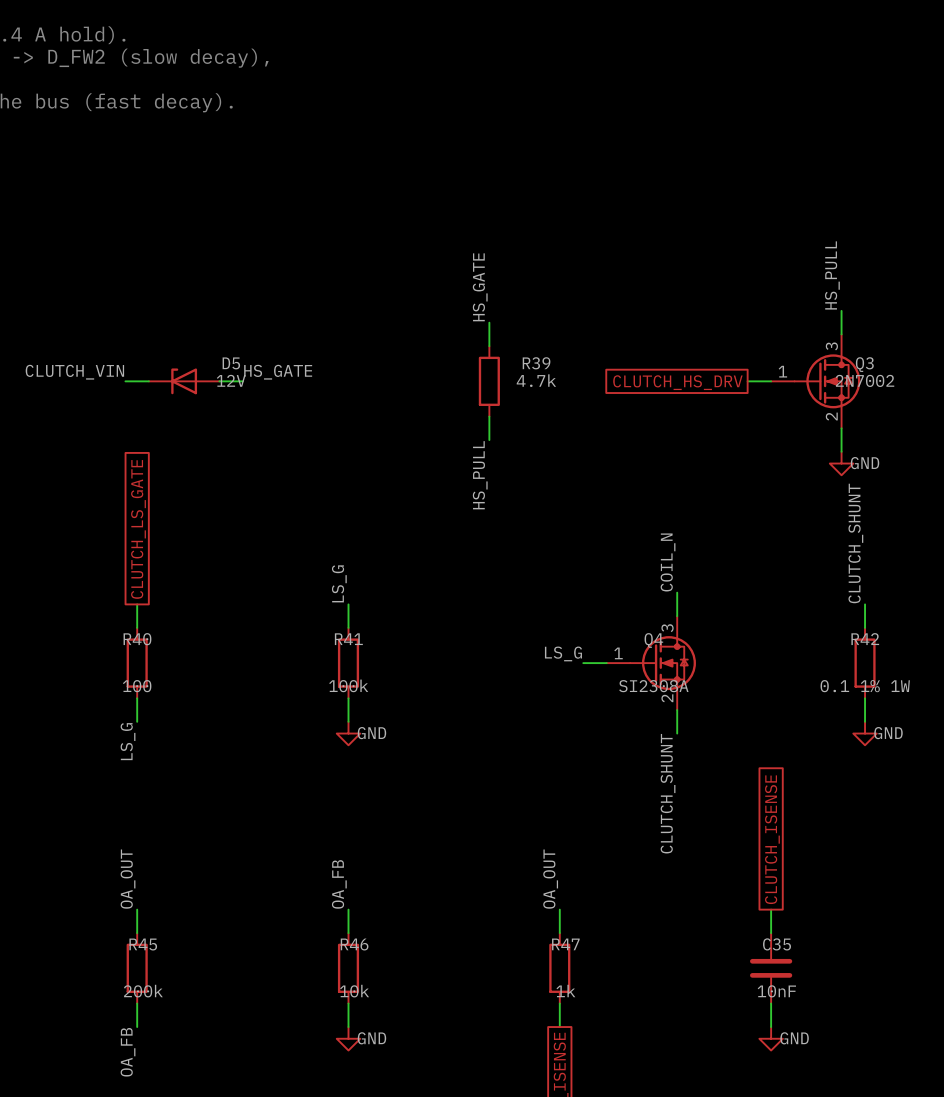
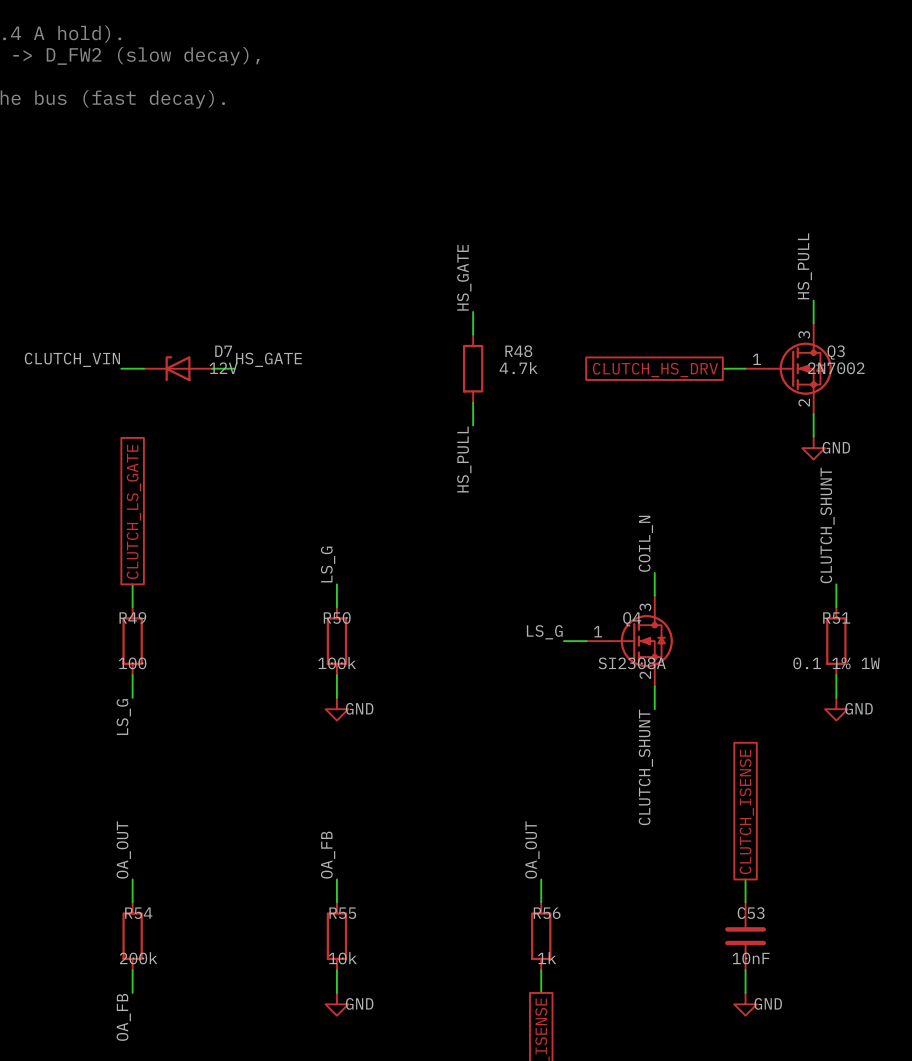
D5 name: D5 (231, 363) -> D7 (223, 351)
R39 name: R39 (536, 363) -> R48 (518, 351)
R40 name: R40 (137, 639) -> R49 (132, 617)
R41 name: R41 (348, 639) -> R50 (337, 617)
R42 name: R42 (865, 639) -> R51 (836, 618)
R45 name: R45 (143, 944) -> R54 (138, 913)
R46 name: R46 (354, 944) -> R55 (342, 913)
R47 name: R47 (565, 944) -> R56 (547, 913)
C35 name: C35 (777, 944) -> C53 (751, 913)

